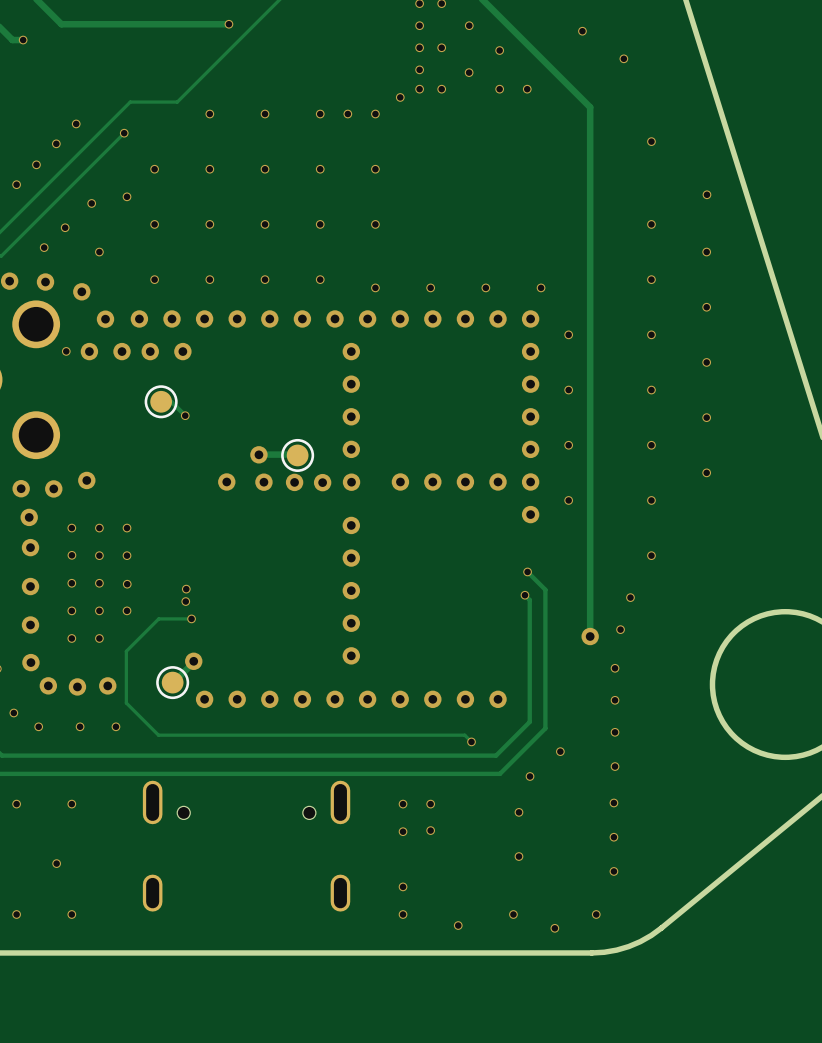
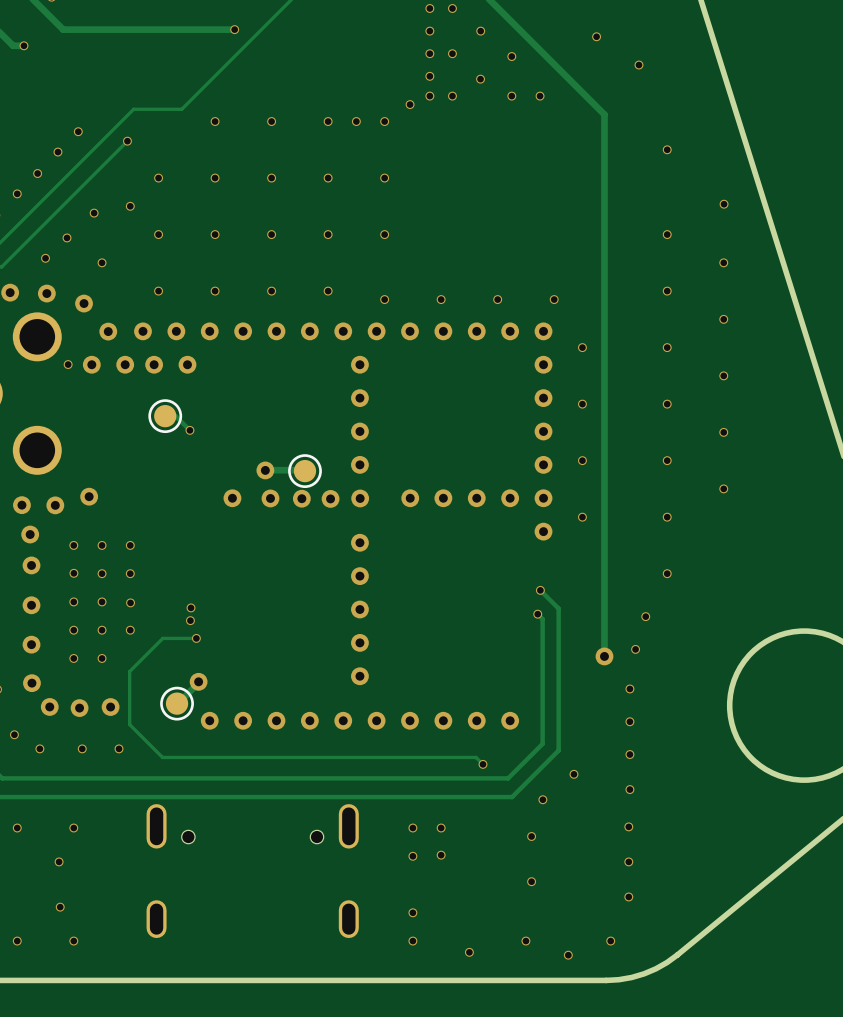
via: none -> (59, 861)
via: (56, 863) -> none
via: none -> (60, 907)

